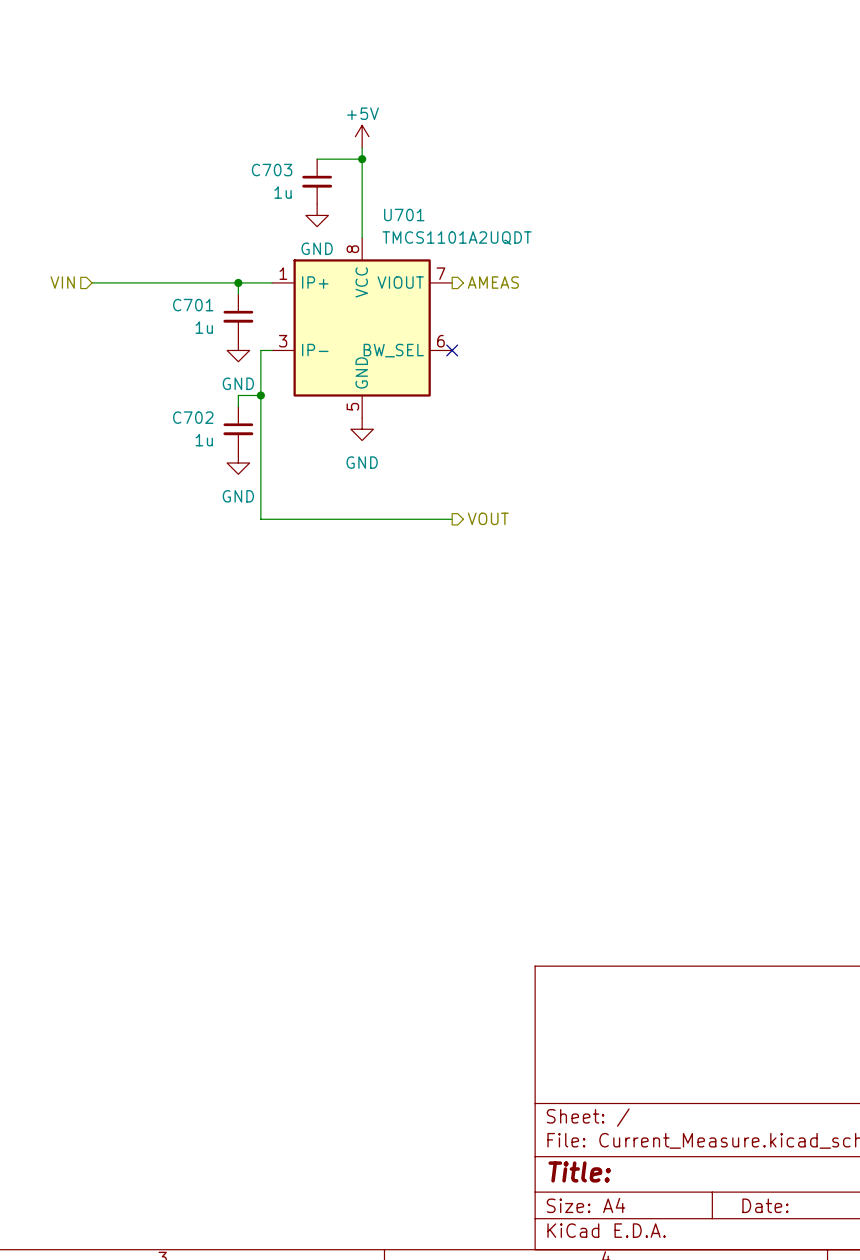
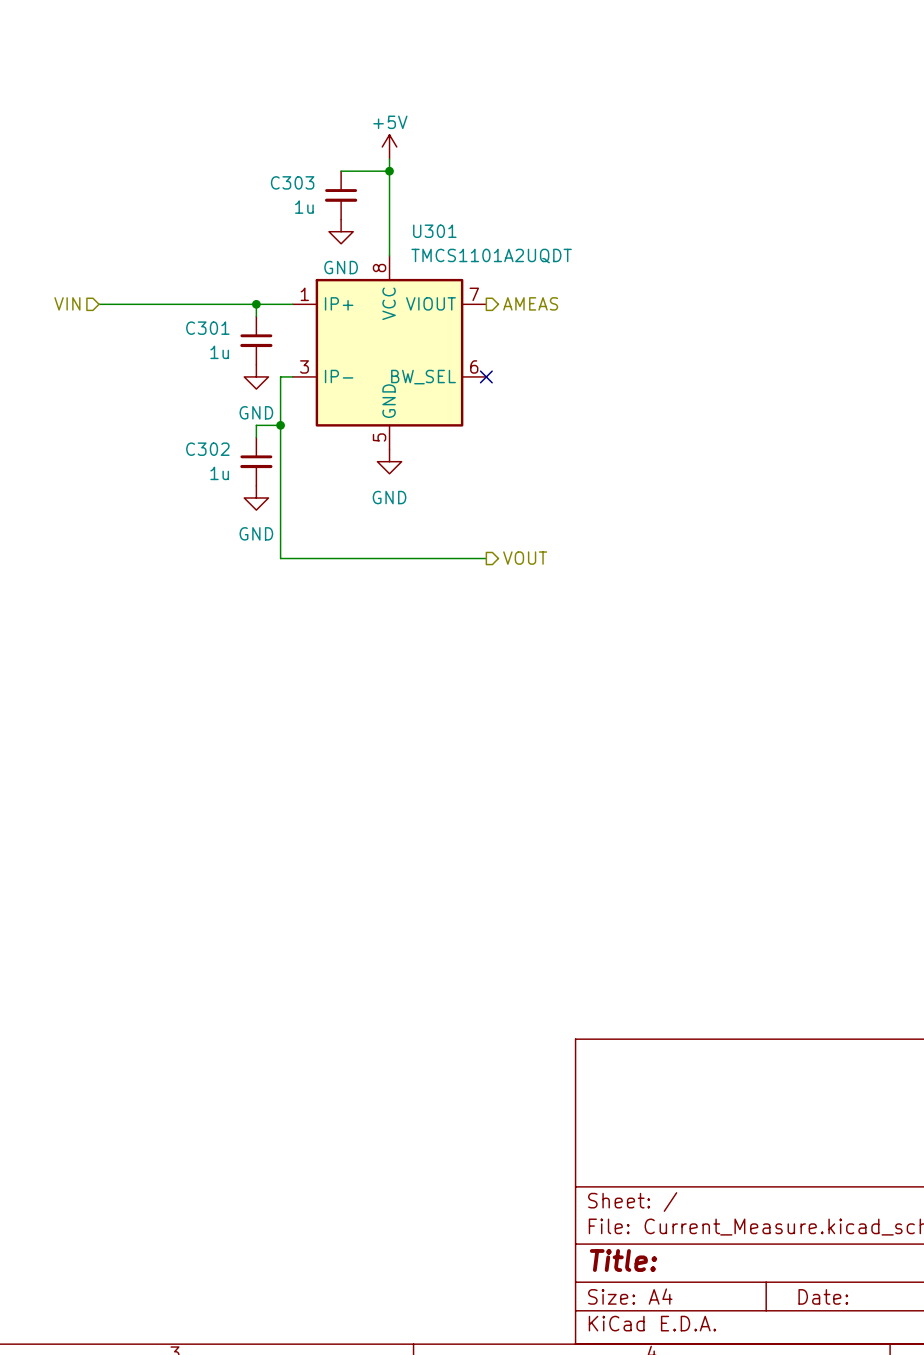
C703 name: C703 (272, 170) -> C303 (292, 182)
U701 name: U701 (404, 215) -> U301 (434, 231)
C701 name: C701 (193, 305) -> C301 (207, 328)
C702 name: C702 (193, 417) -> C302 (207, 449)

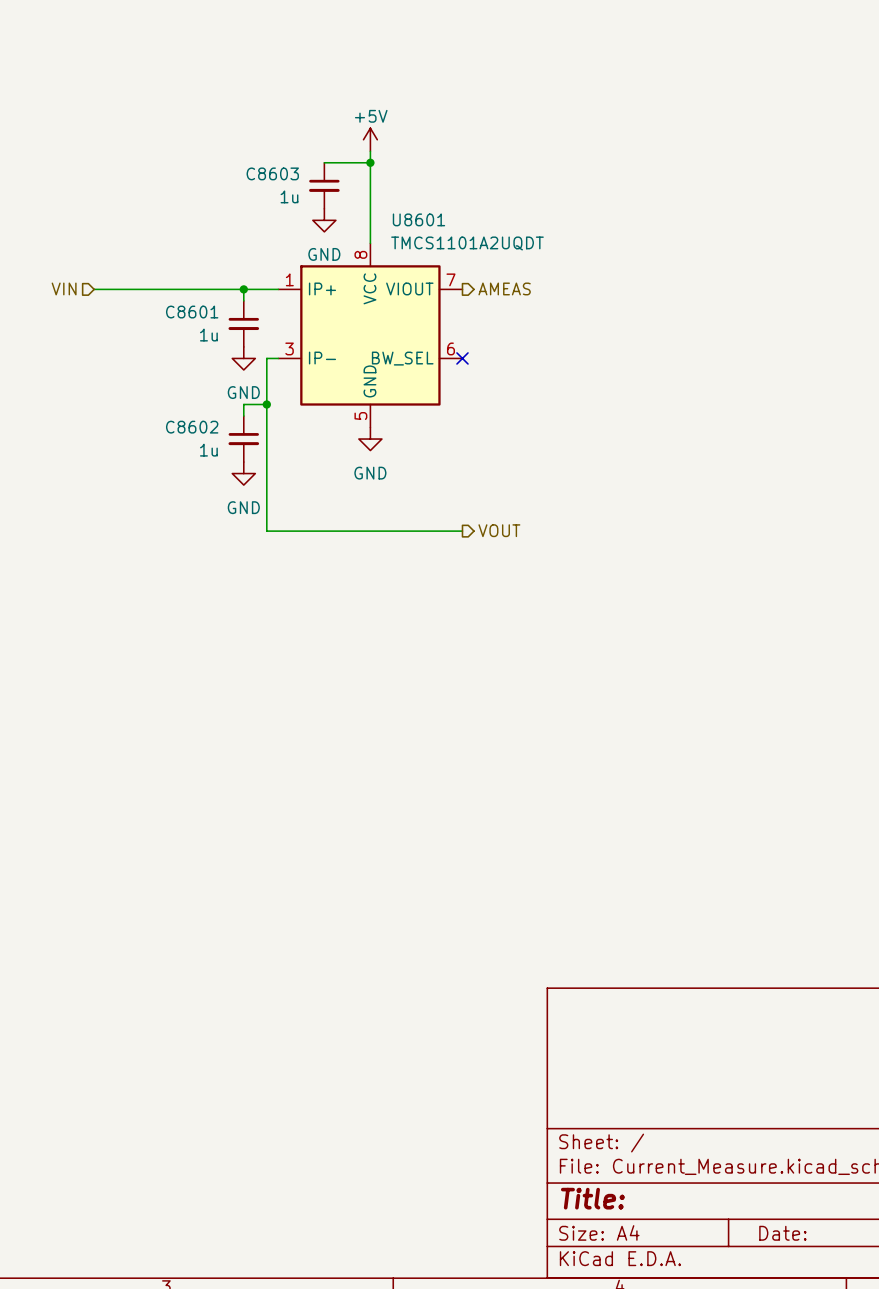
C303 name: C303 (292, 182) -> C8603 (272, 173)
U301 name: U301 (434, 231) -> U8601 (418, 219)
C301 name: C301 (207, 328) -> C8601 (192, 312)
C302 name: C302 (207, 449) -> C8602 (192, 427)

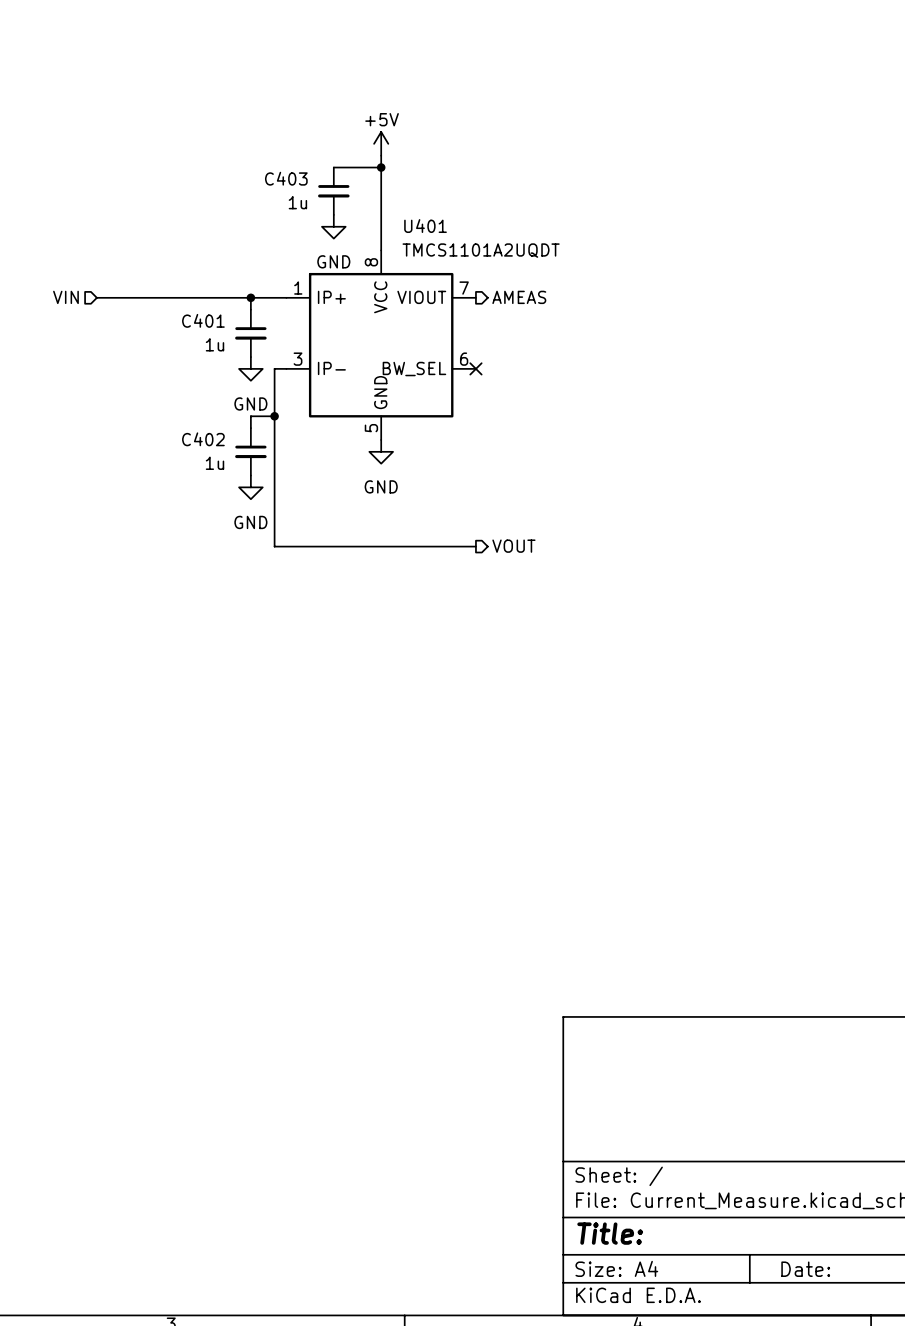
C8603 name: C8603 (272, 173) -> C403 (286, 178)
U8601 name: U8601 (418, 219) -> U401 (425, 226)
C8601 name: C8601 (192, 312) -> C401 (203, 320)
C8602 name: C8602 (192, 427) -> C402 (203, 439)

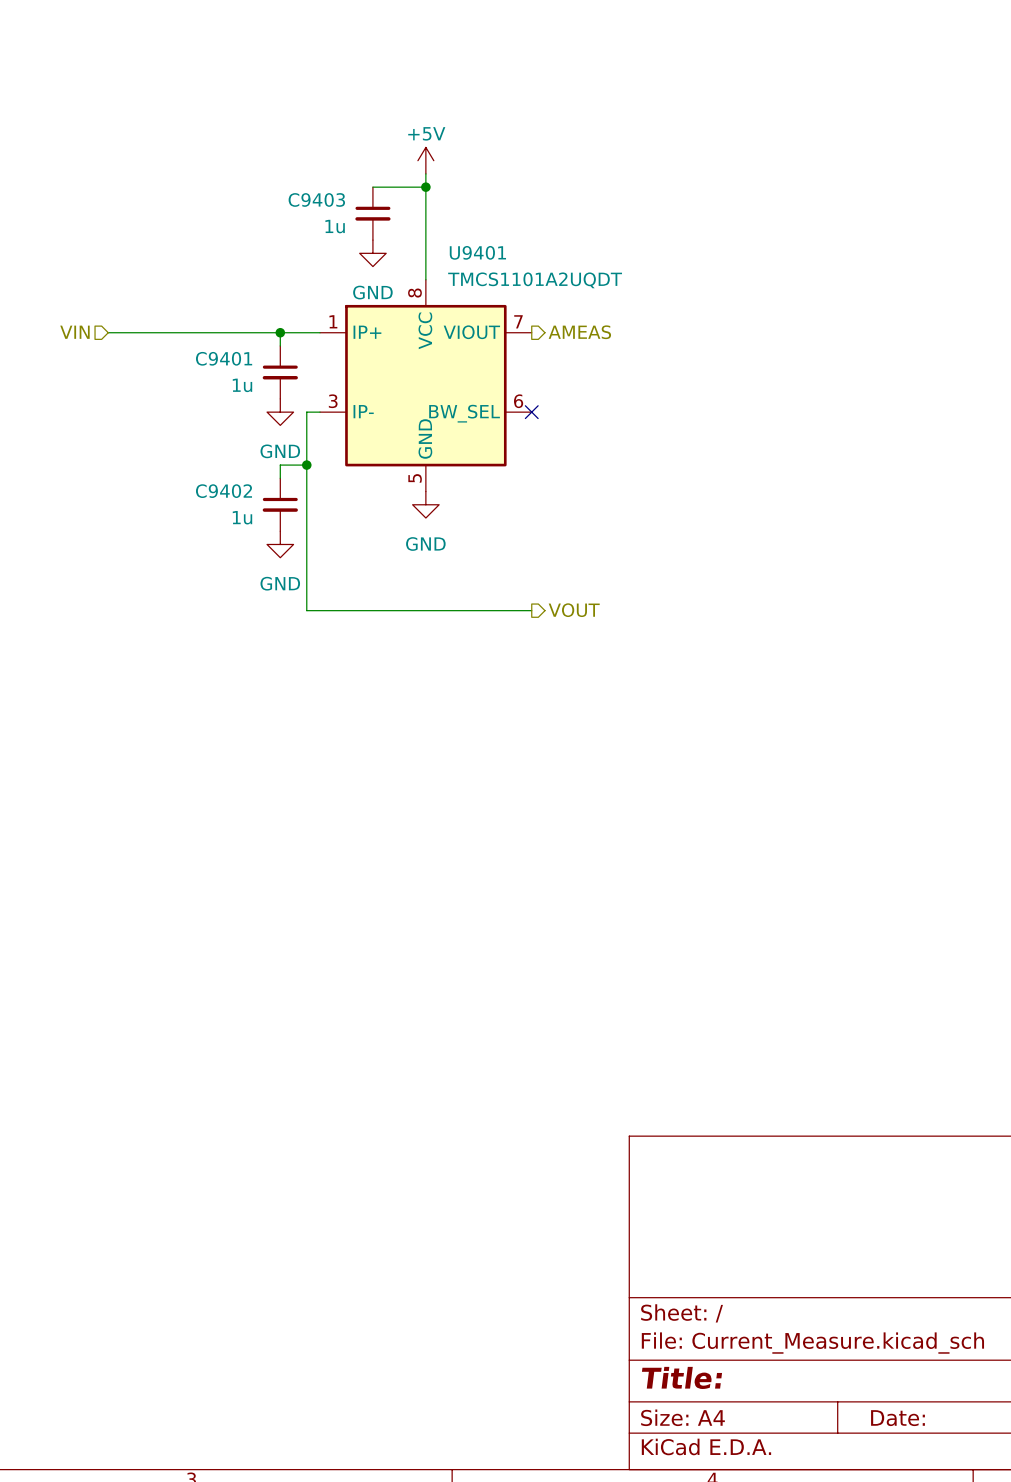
C403 name: C403 (286, 178) -> C9403 (316, 199)
U401 name: U401 (425, 226) -> U9401 (477, 252)
C401 name: C401 (203, 320) -> C9401 (224, 358)
C402 name: C402 (203, 439) -> C9402 (224, 491)

